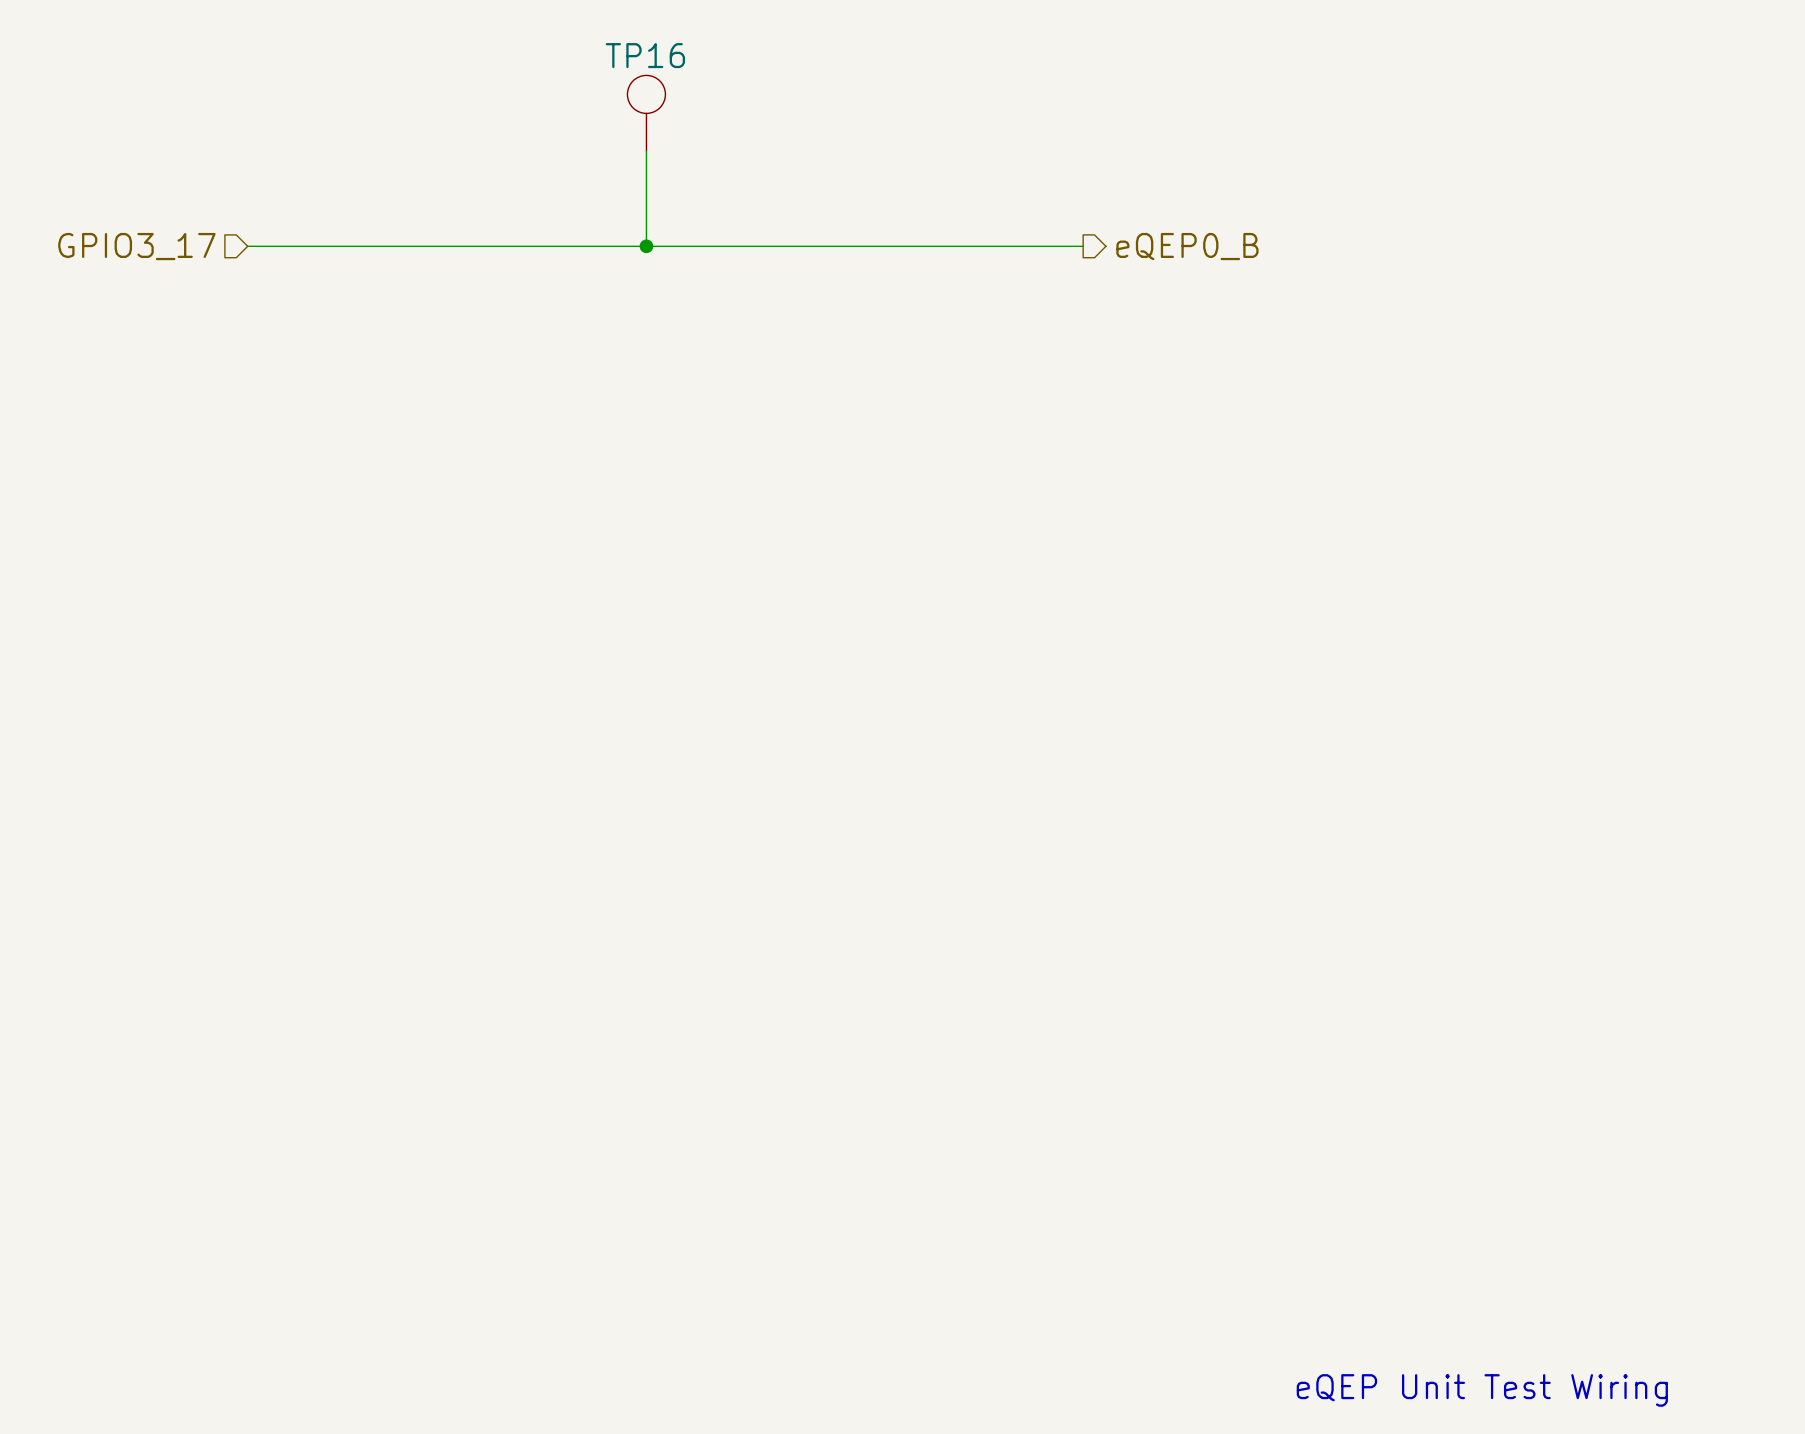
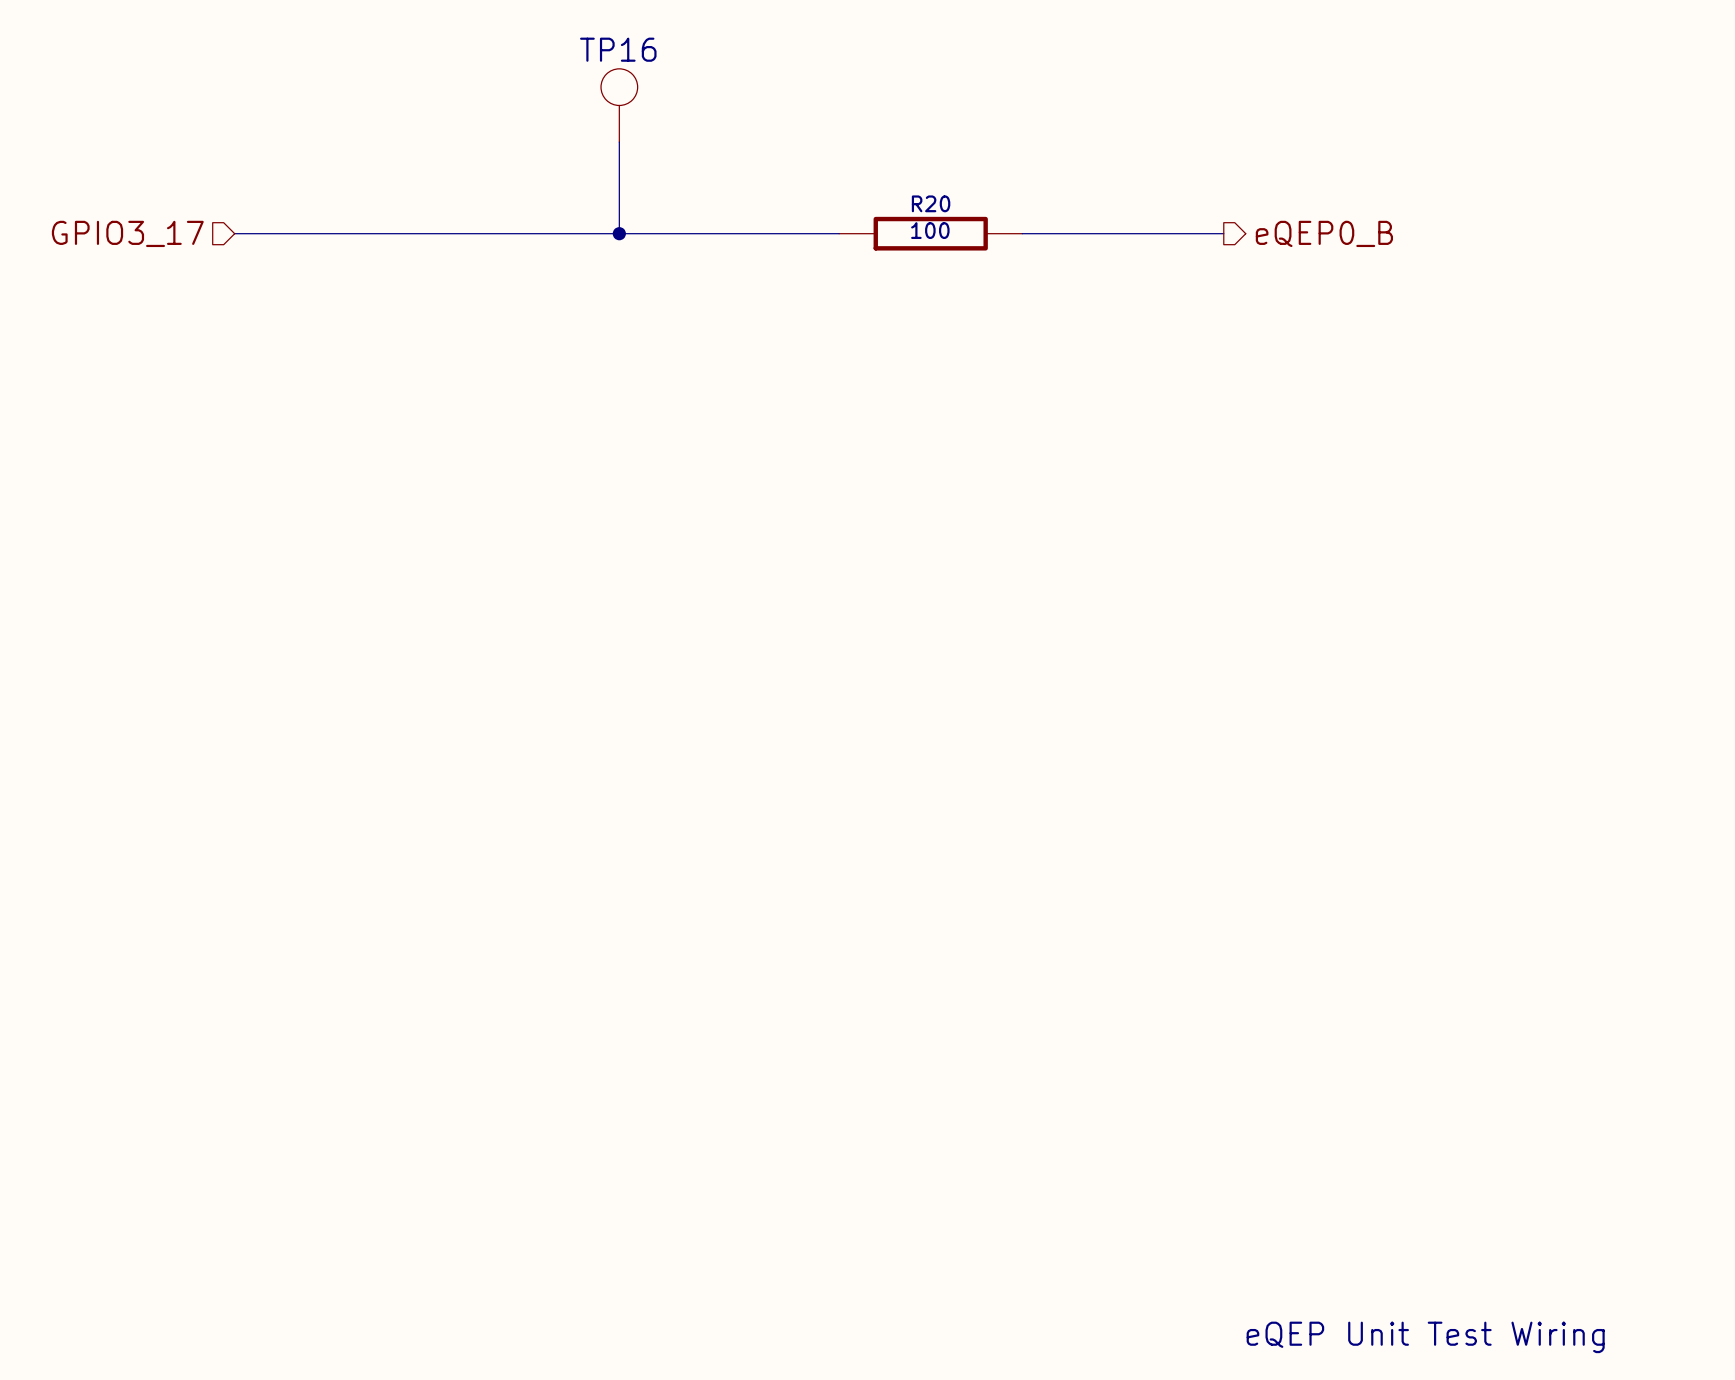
wire: (874, 246) (1064, 246) -> (1040, 233) (1223, 233)
R20: none -> 100 (930, 233)
hierarchical label position: eQEP0_B (1187, 246) -> eQEP0_B (1324, 233)

